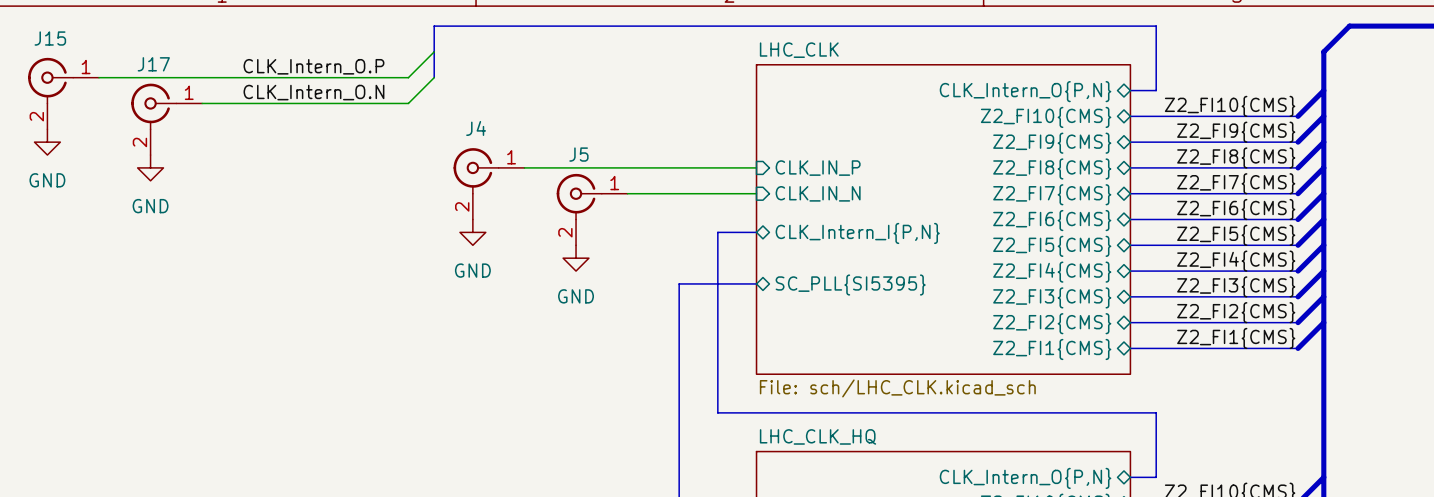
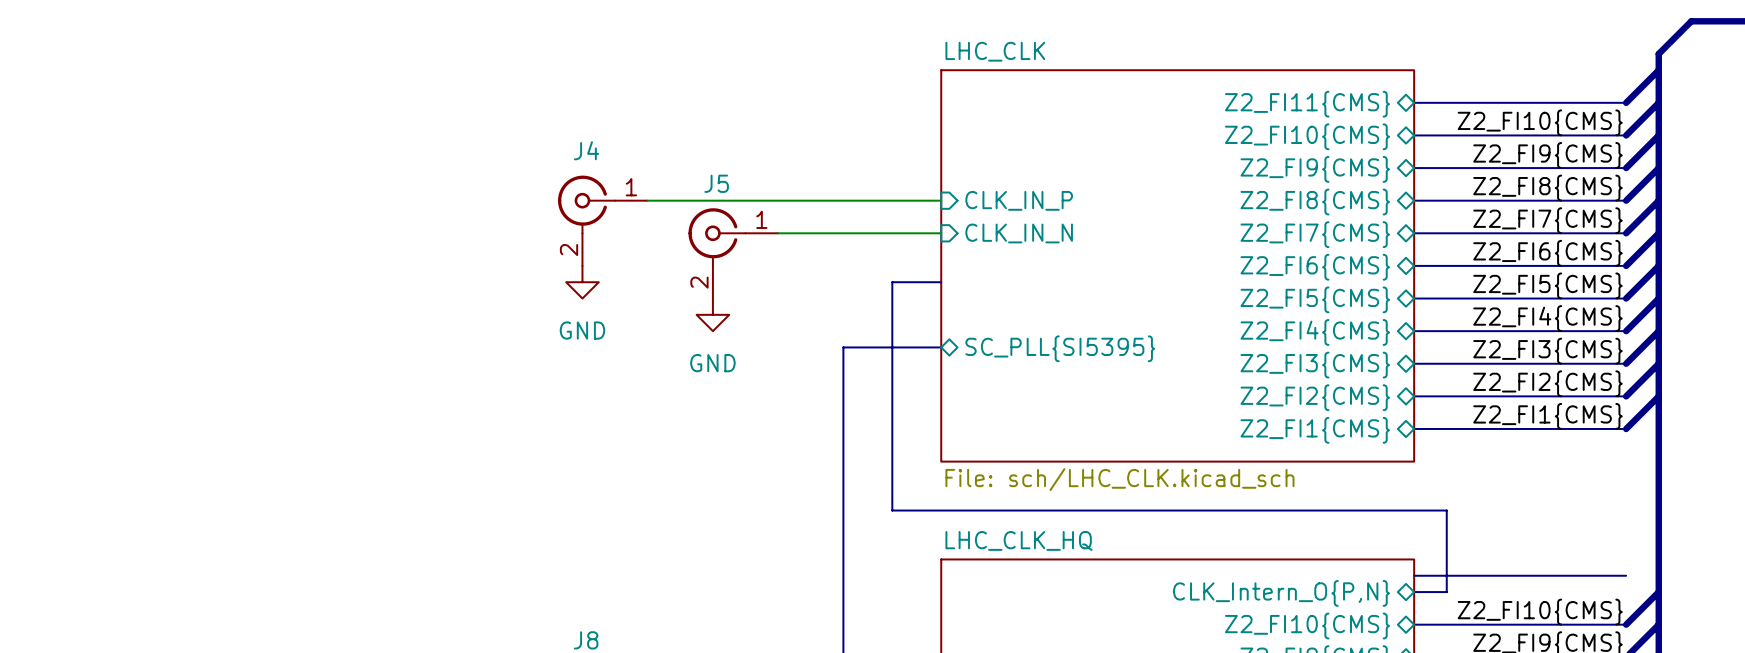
wire: (434, 51) (408, 77) (98, 77) -> none
line: none -> (1658, 70) (1626, 102)
label: CLK_Intern_O.P (313, 66) -> none
wire: (434, 77) (408, 103) (202, 103) -> none
bus: (434, 77) (434, 26) (1156, 26) (1156, 90) -> (1626, 102) (1446, 102)
sheet pin: CLK_Intern_O{P,N} (1025, 91) -> Z2_FI11{CMS} (1307, 104)
label: CLK_Intern_O.N (313, 92) -> none
J15: (63, 93) -> none
J17: (166, 119) -> none
power symbol: GND (47, 142) -> none
power symbol: GND (150, 167) -> none
sheet pin: CLK_Intern_I{P,N} (857, 233) -> none
bus: none -> (1414, 575) (1626, 575)

